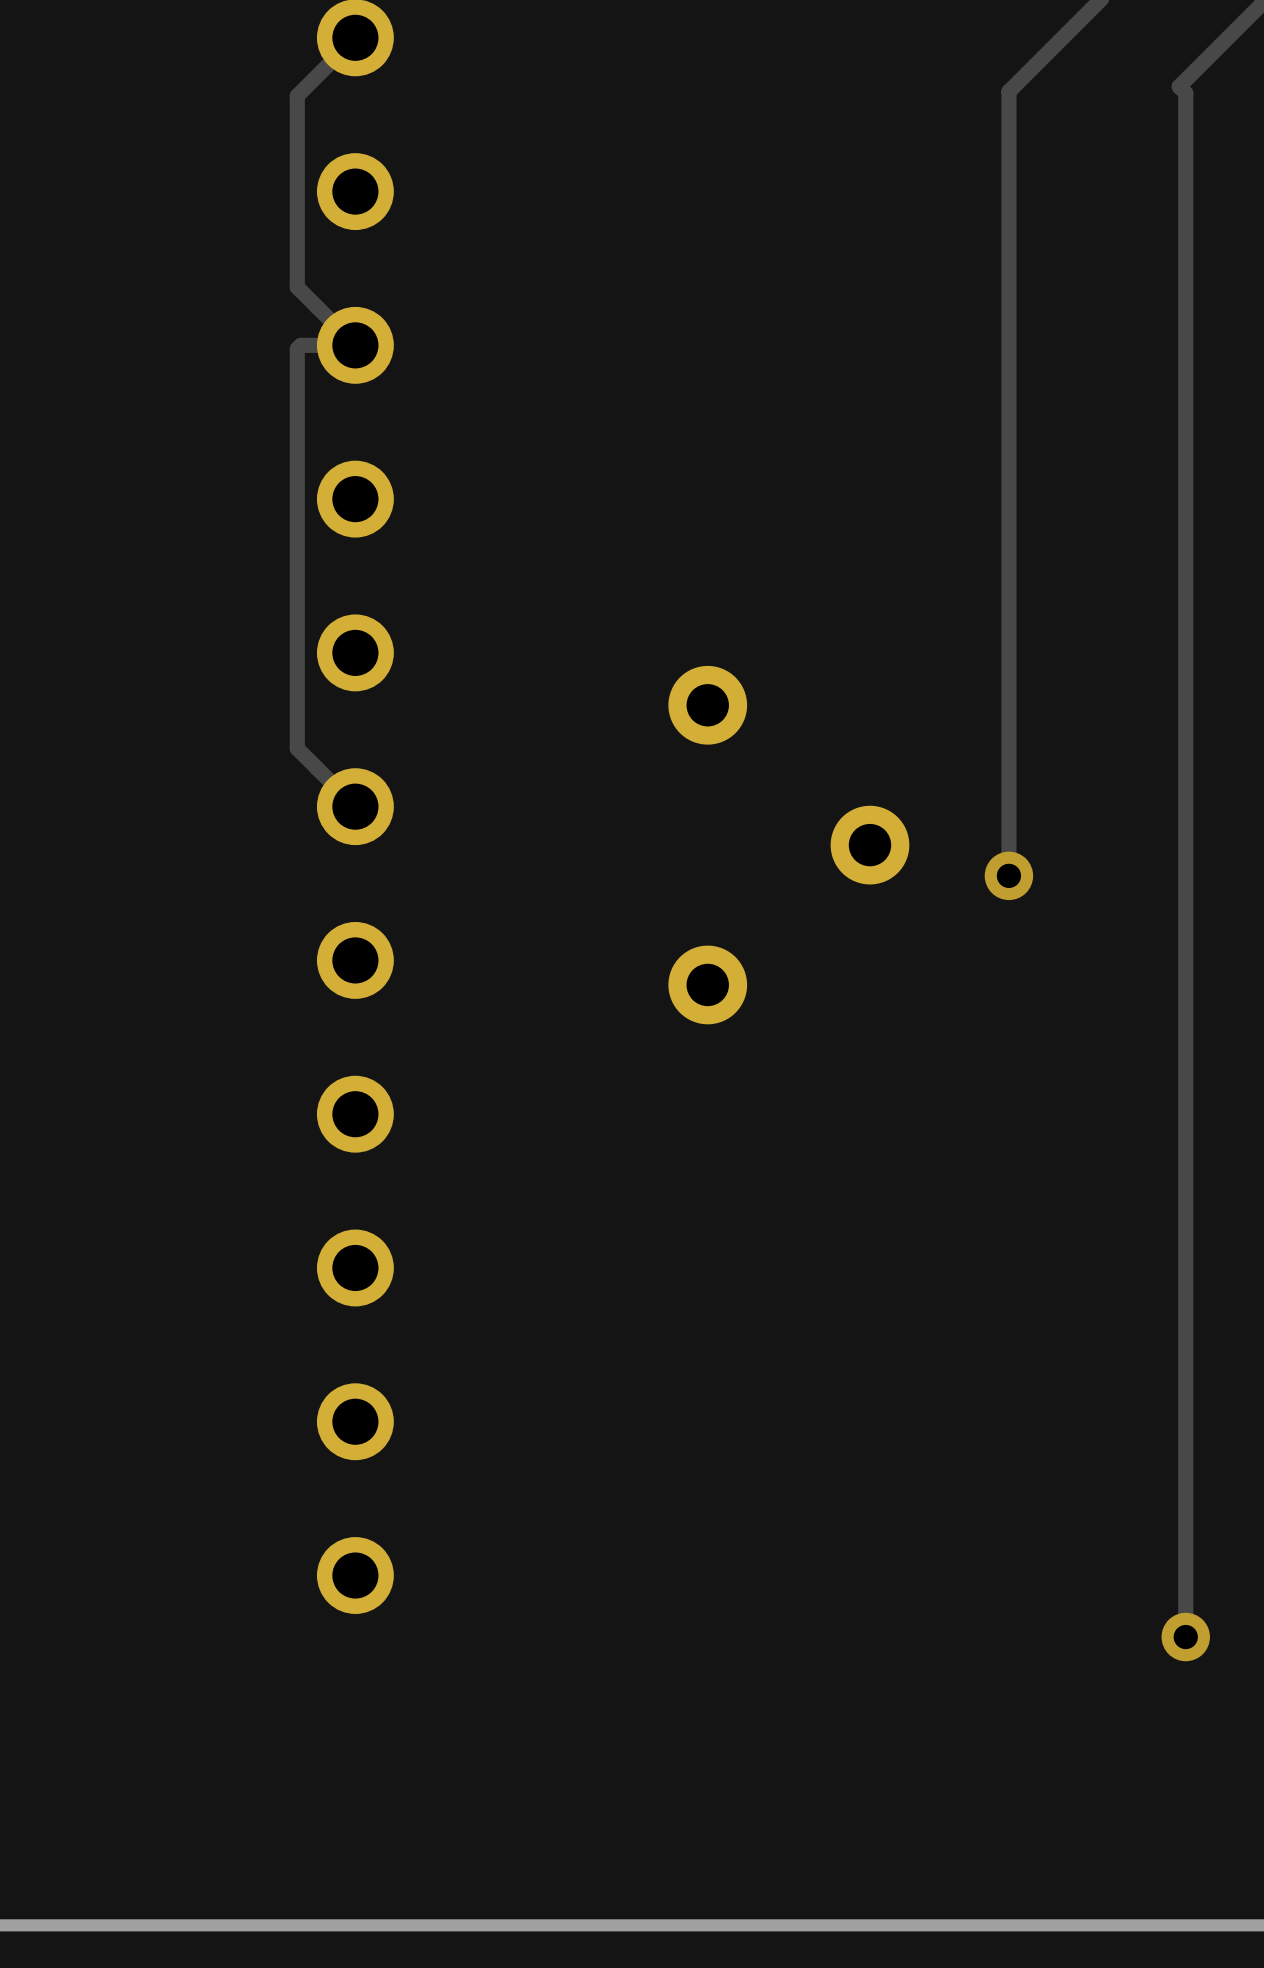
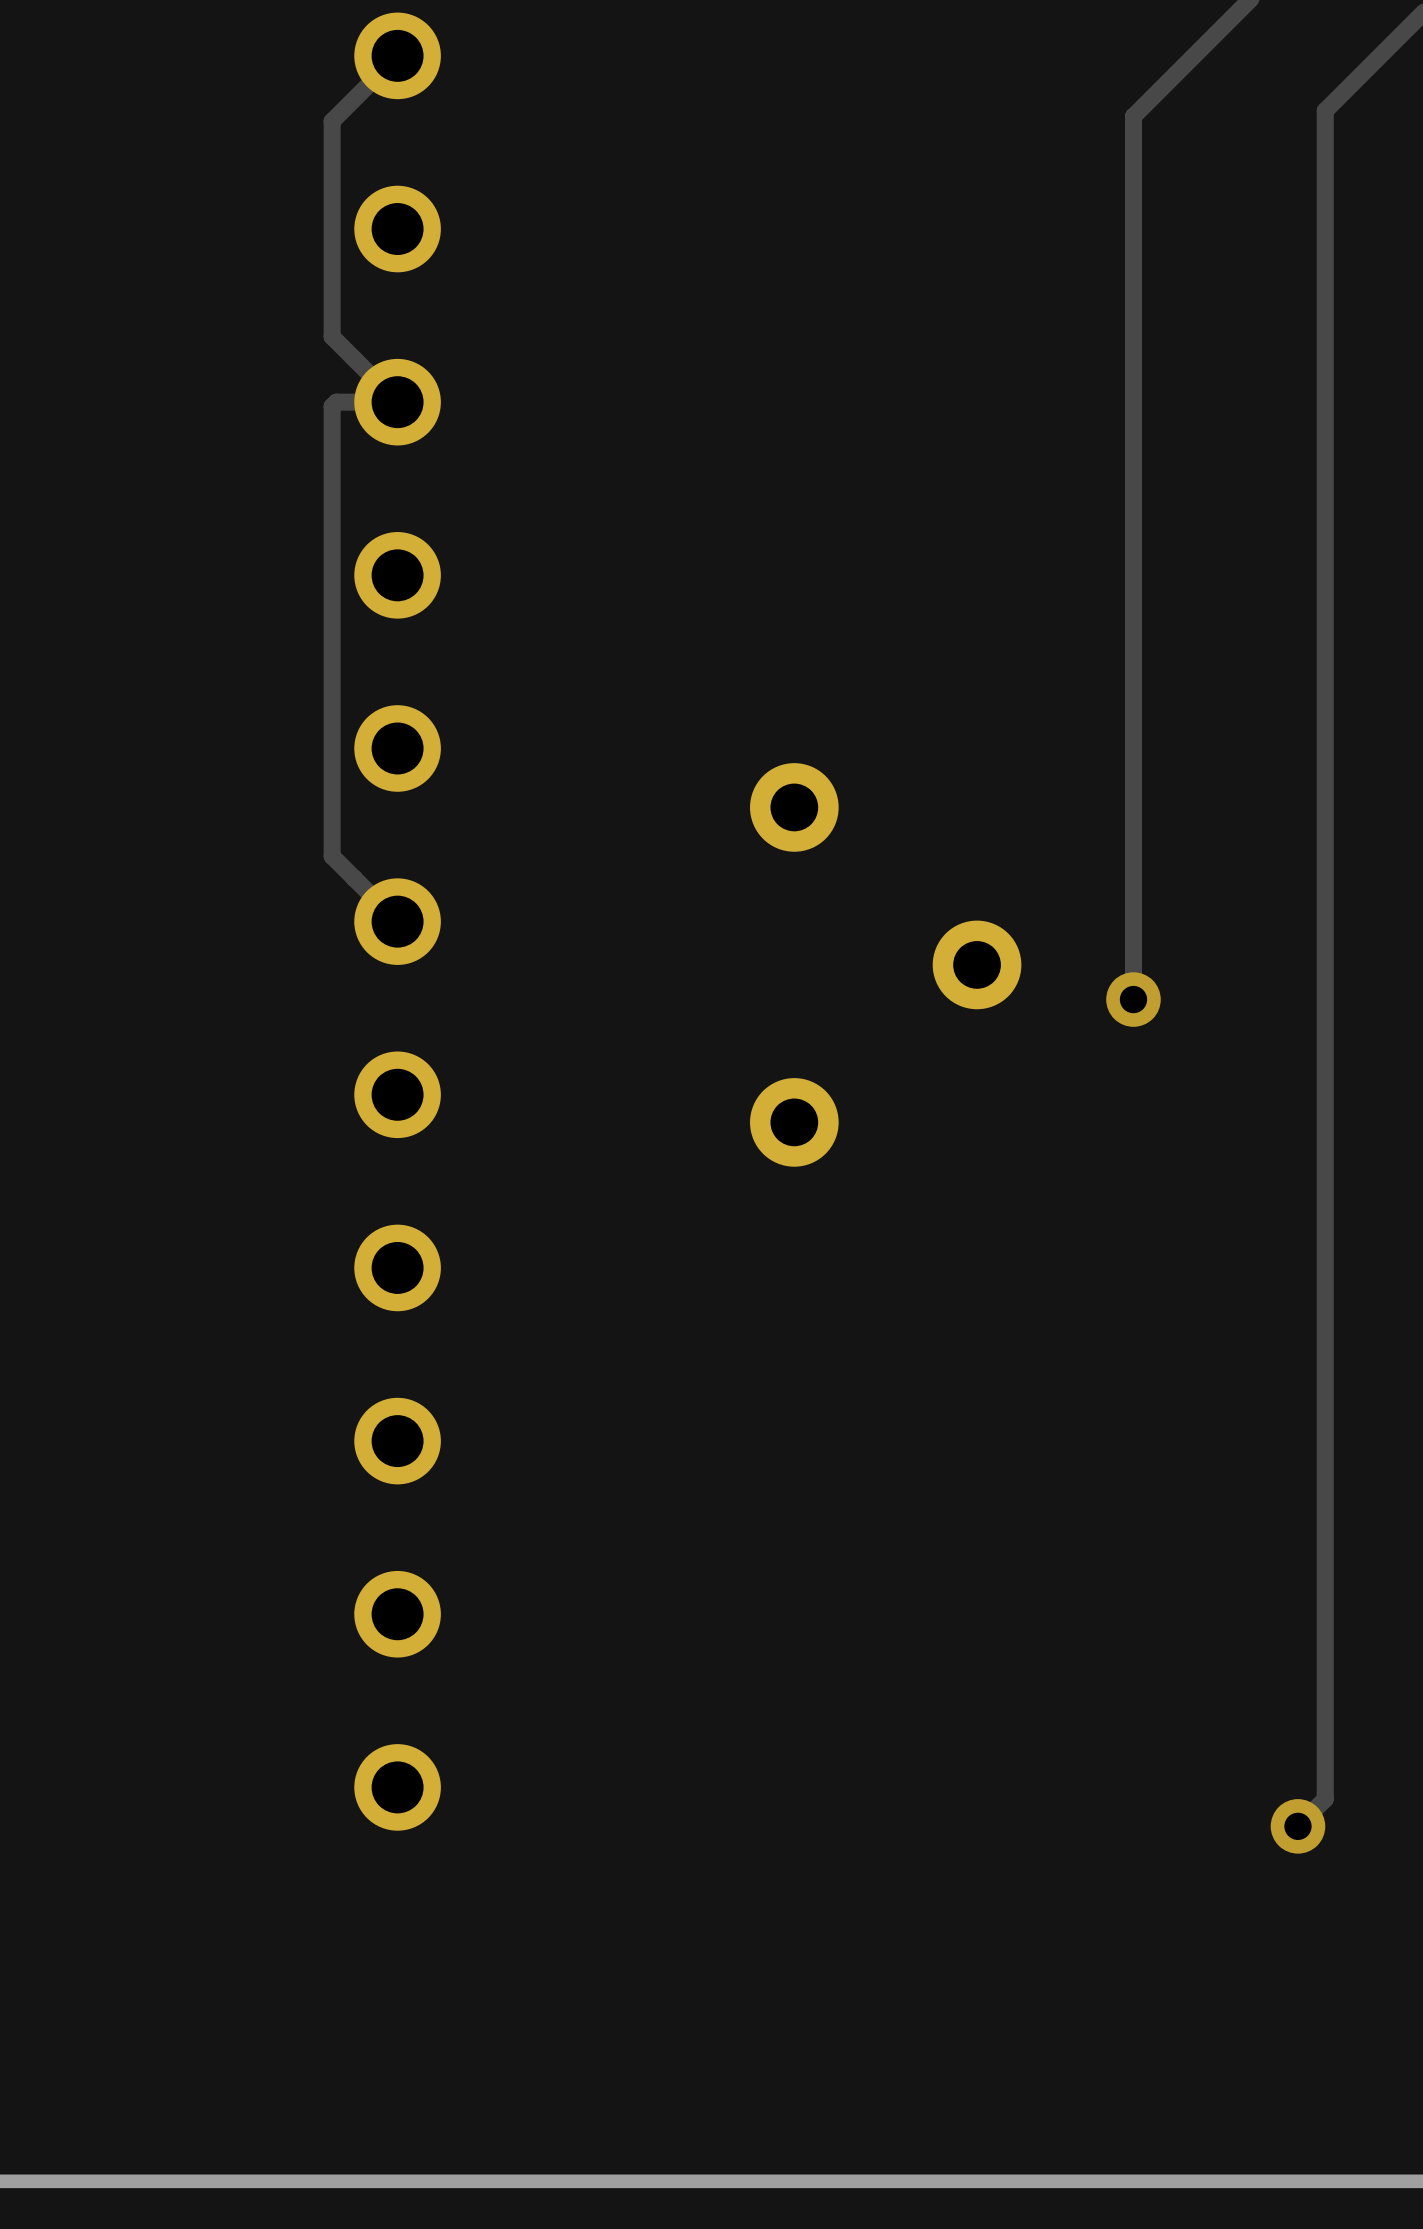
track: (1179, 86) (1185, 93) (1185, 1637) -> (1325, 110) (1325, 1799) (1297, 1826)
via position: (1185, 1637) -> (1297, 1826)

